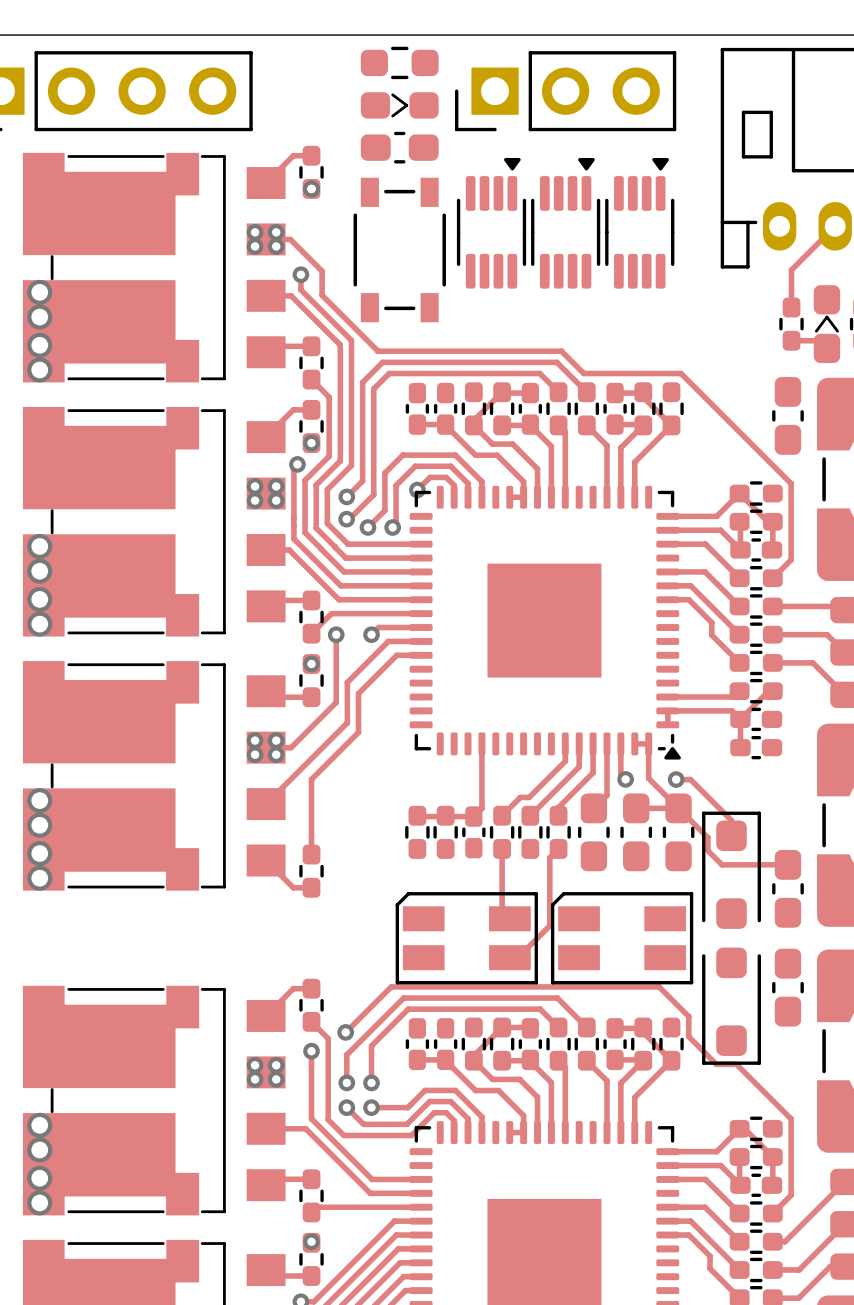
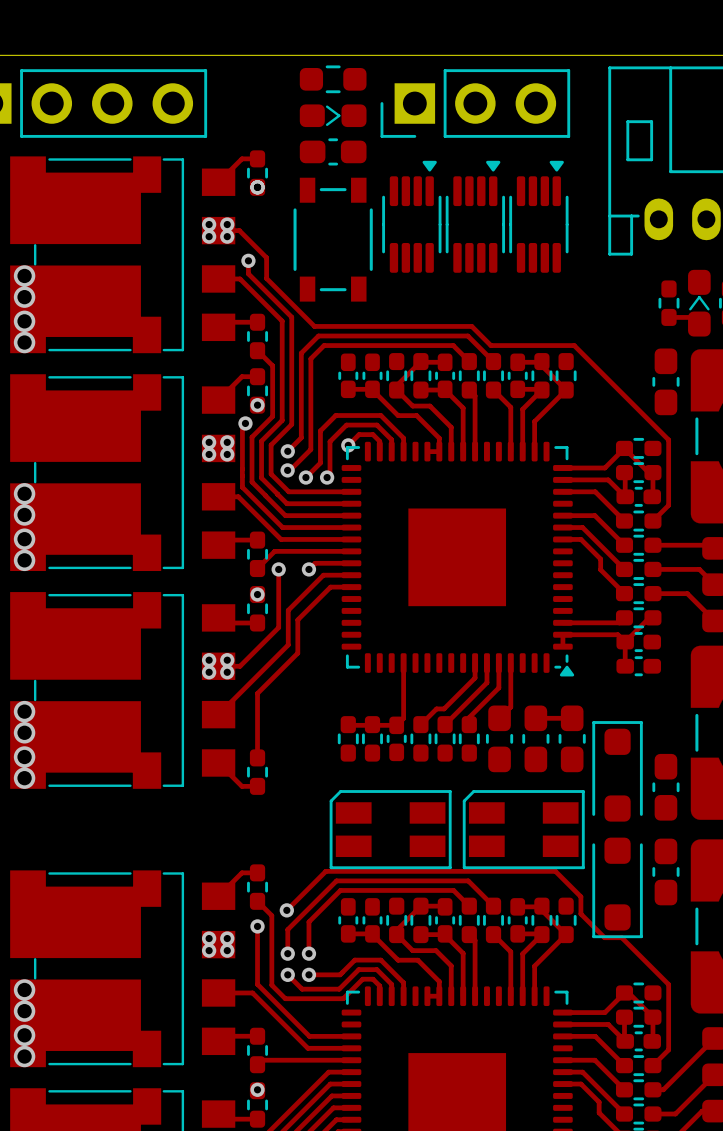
track: (835, 226) (791, 270) (791, 307) -> none
track: (620, 743) (620, 774) (625, 779) -> none
track: (634, 743) (648, 743) (648, 778) (707, 837) (707, 850) (722, 864) (787, 864) -> none
via: (625, 779) -> none
track: (676, 779) (690, 779) (731, 820) (731, 835) -> none
via: (676, 779) -> none
track: (502, 848) (502, 910) (509, 918) -> none
track: (558, 848) (549, 857) (549, 925) (517, 957) (509, 957) -> none

